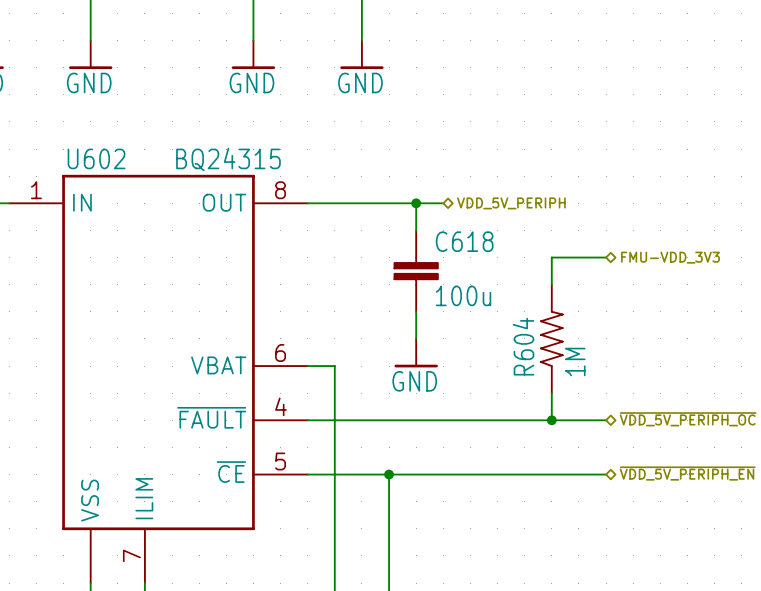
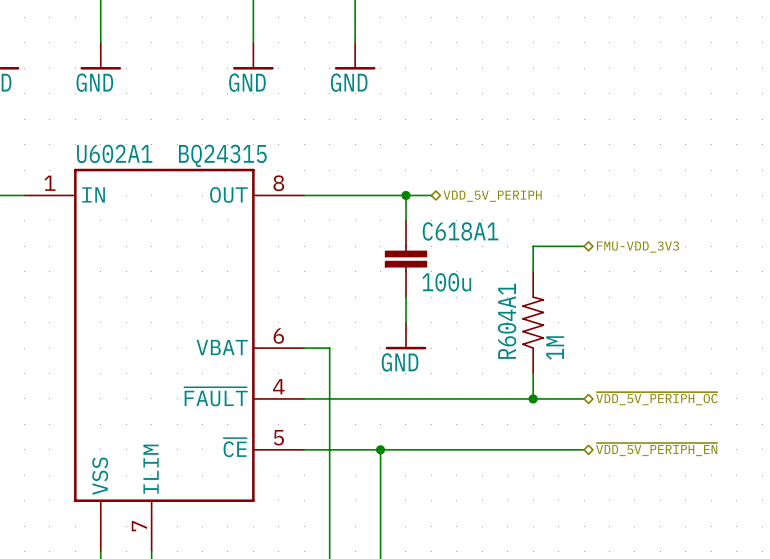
U602 name: U602 (96, 158) -> U602A1 (114, 153)
C618 name: C618 (464, 241) -> C618A1 (460, 231)
R604 name: R604 (523, 346) -> R604A1 (507, 321)

